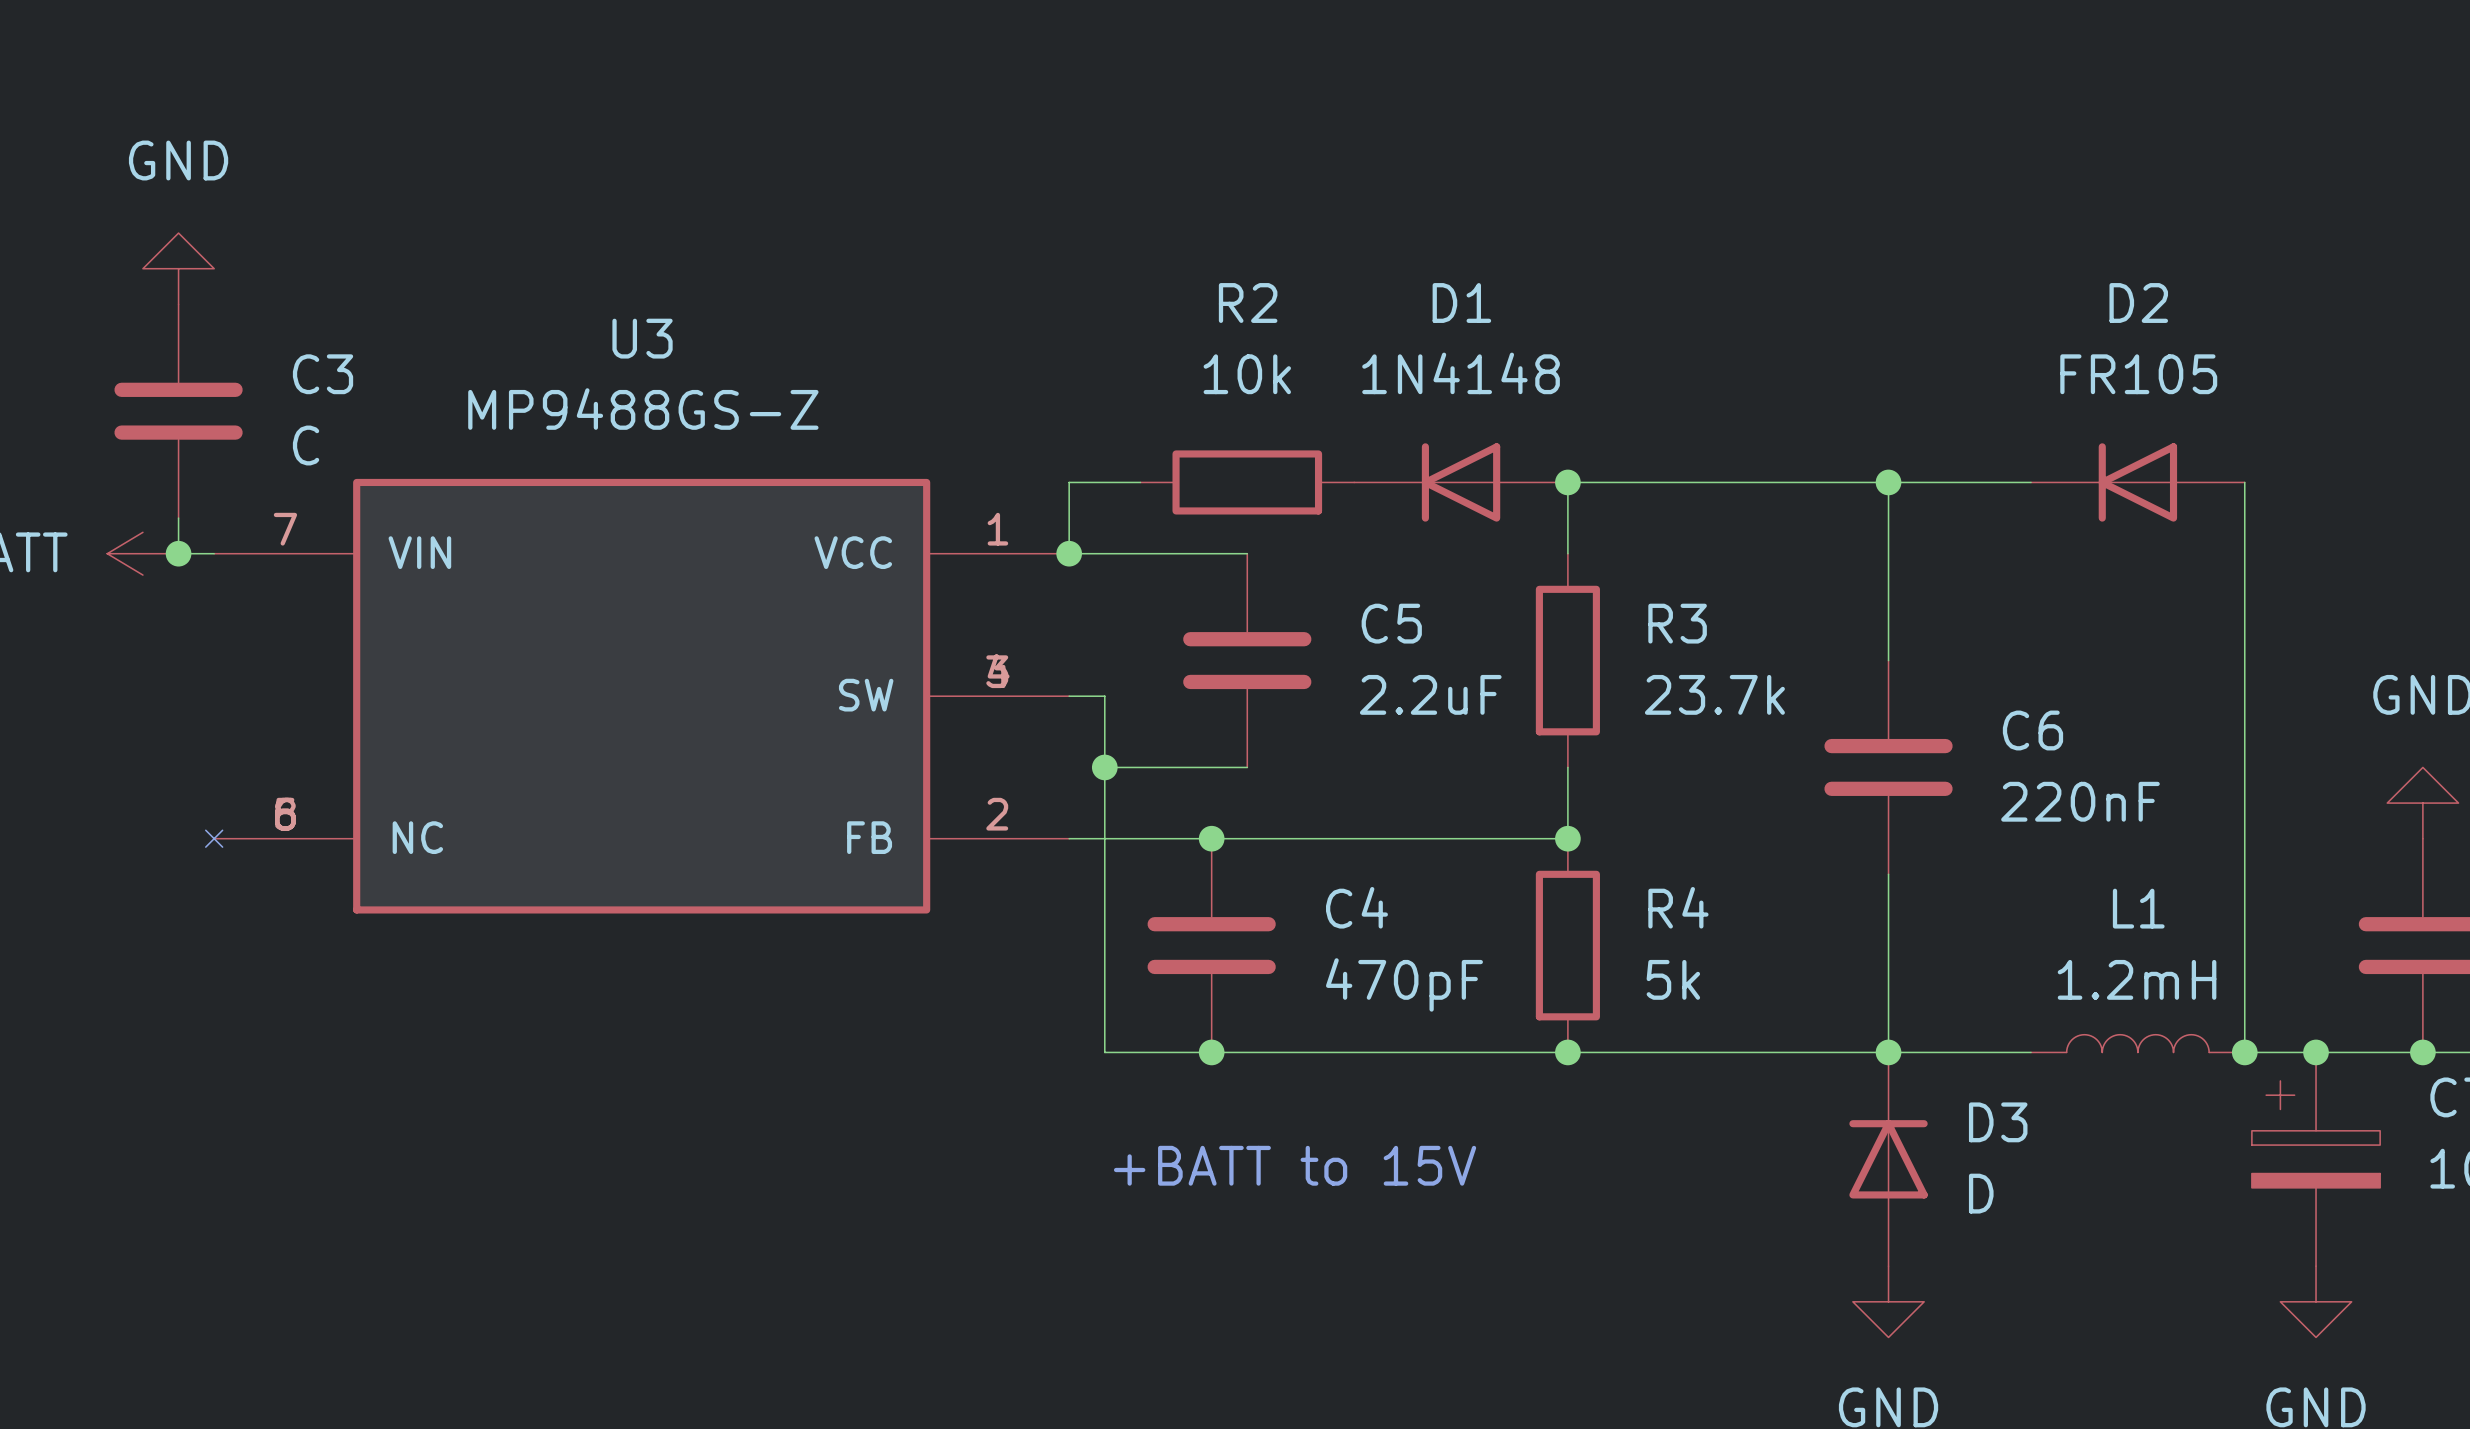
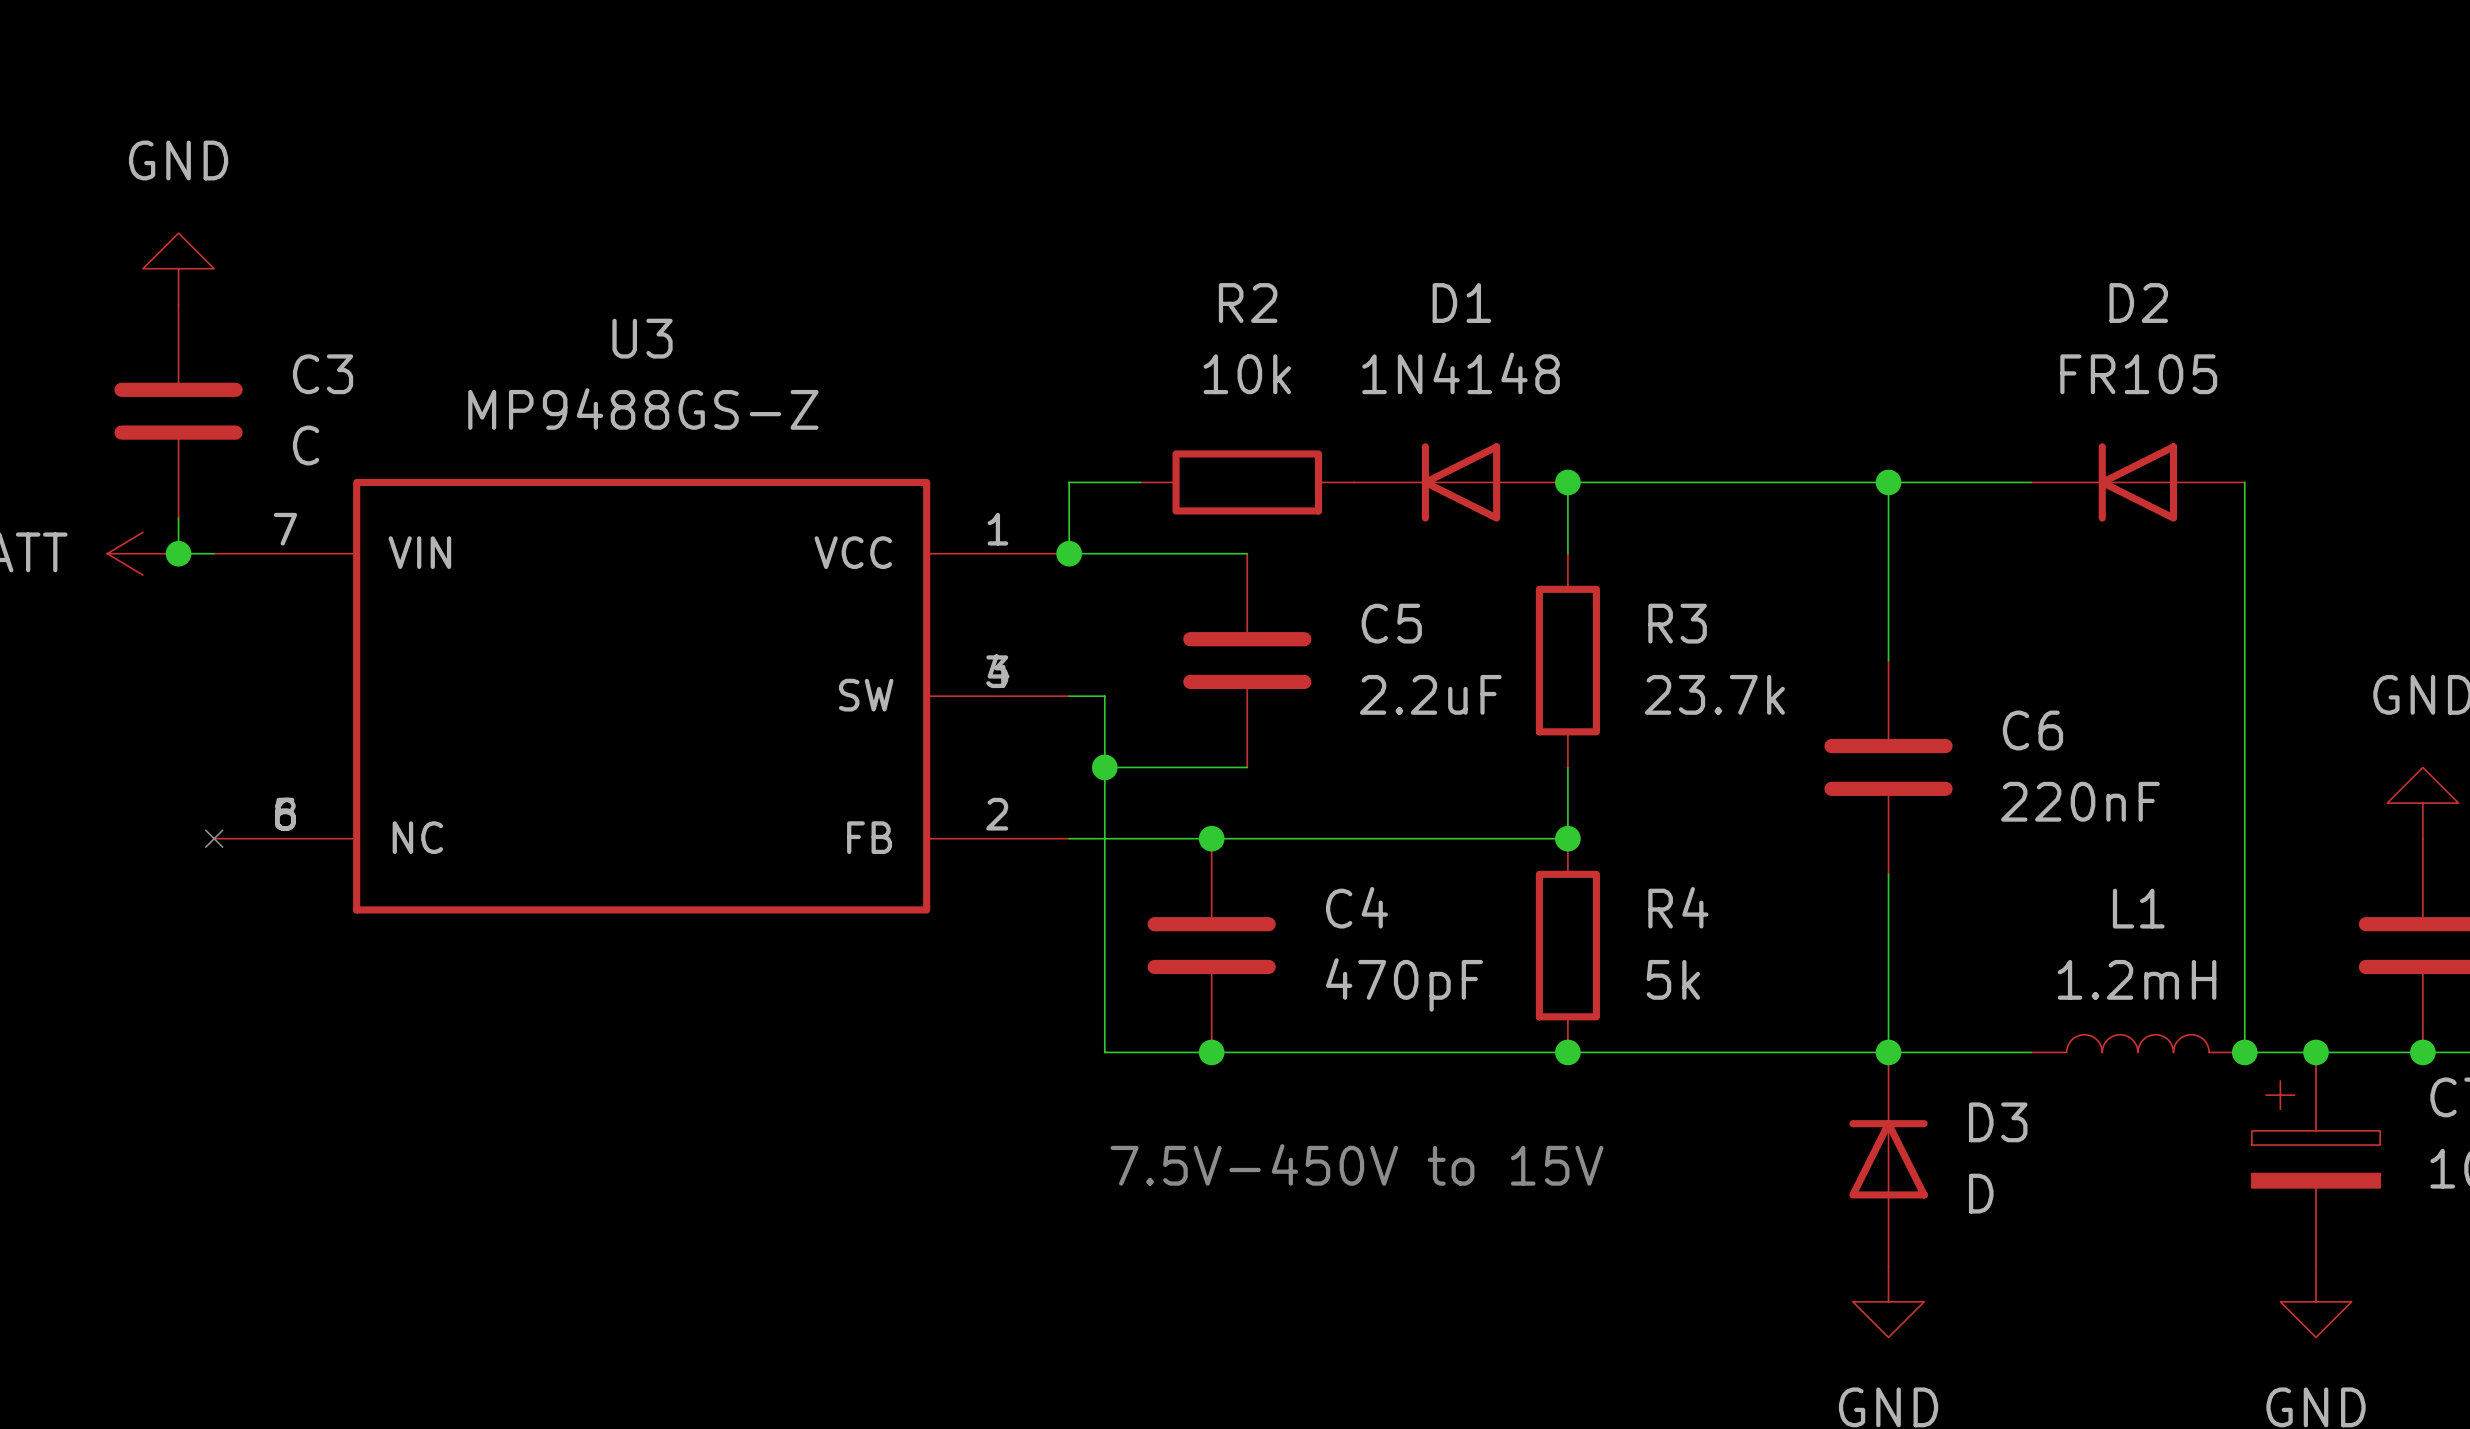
text: +BATT to 15V (1295, 1165) -> 7.5V-450V to 15V (1356, 1164)

